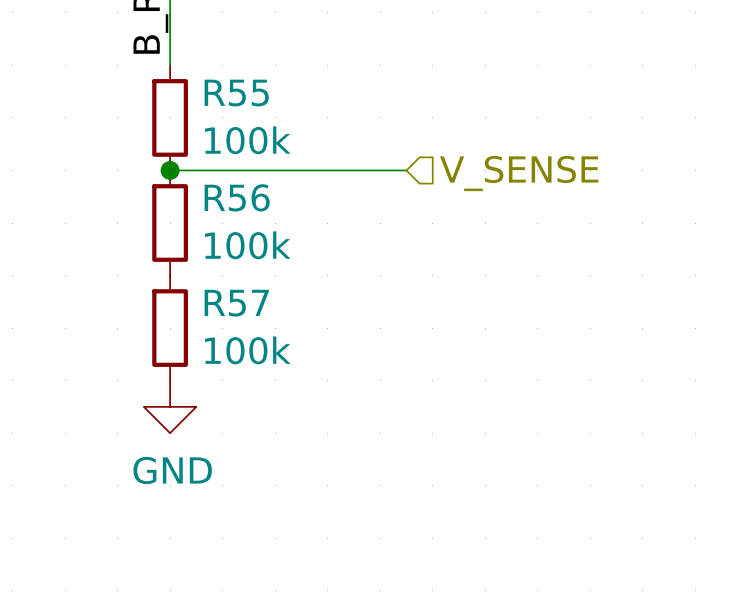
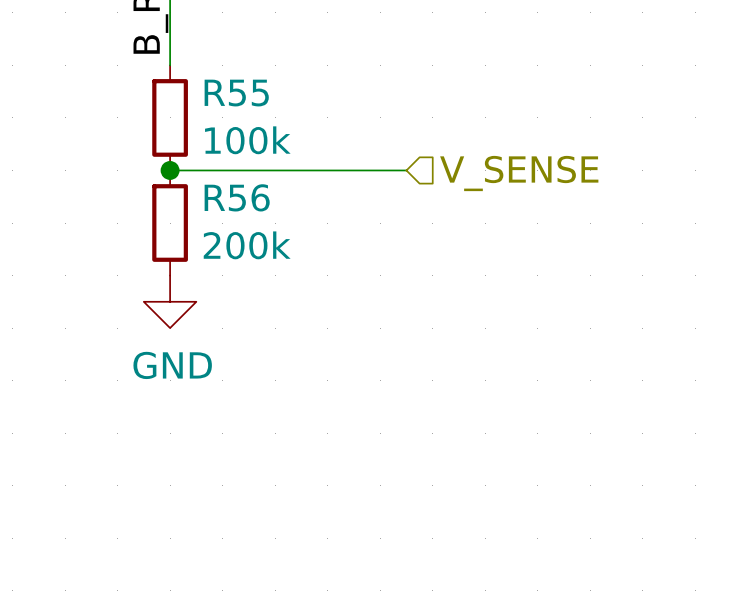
R56 value: 100k (247, 245) -> 200k (247, 245)
R57: 100k (170, 328) -> none
power symbol position: GND (170, 406) -> GND (170, 301)

